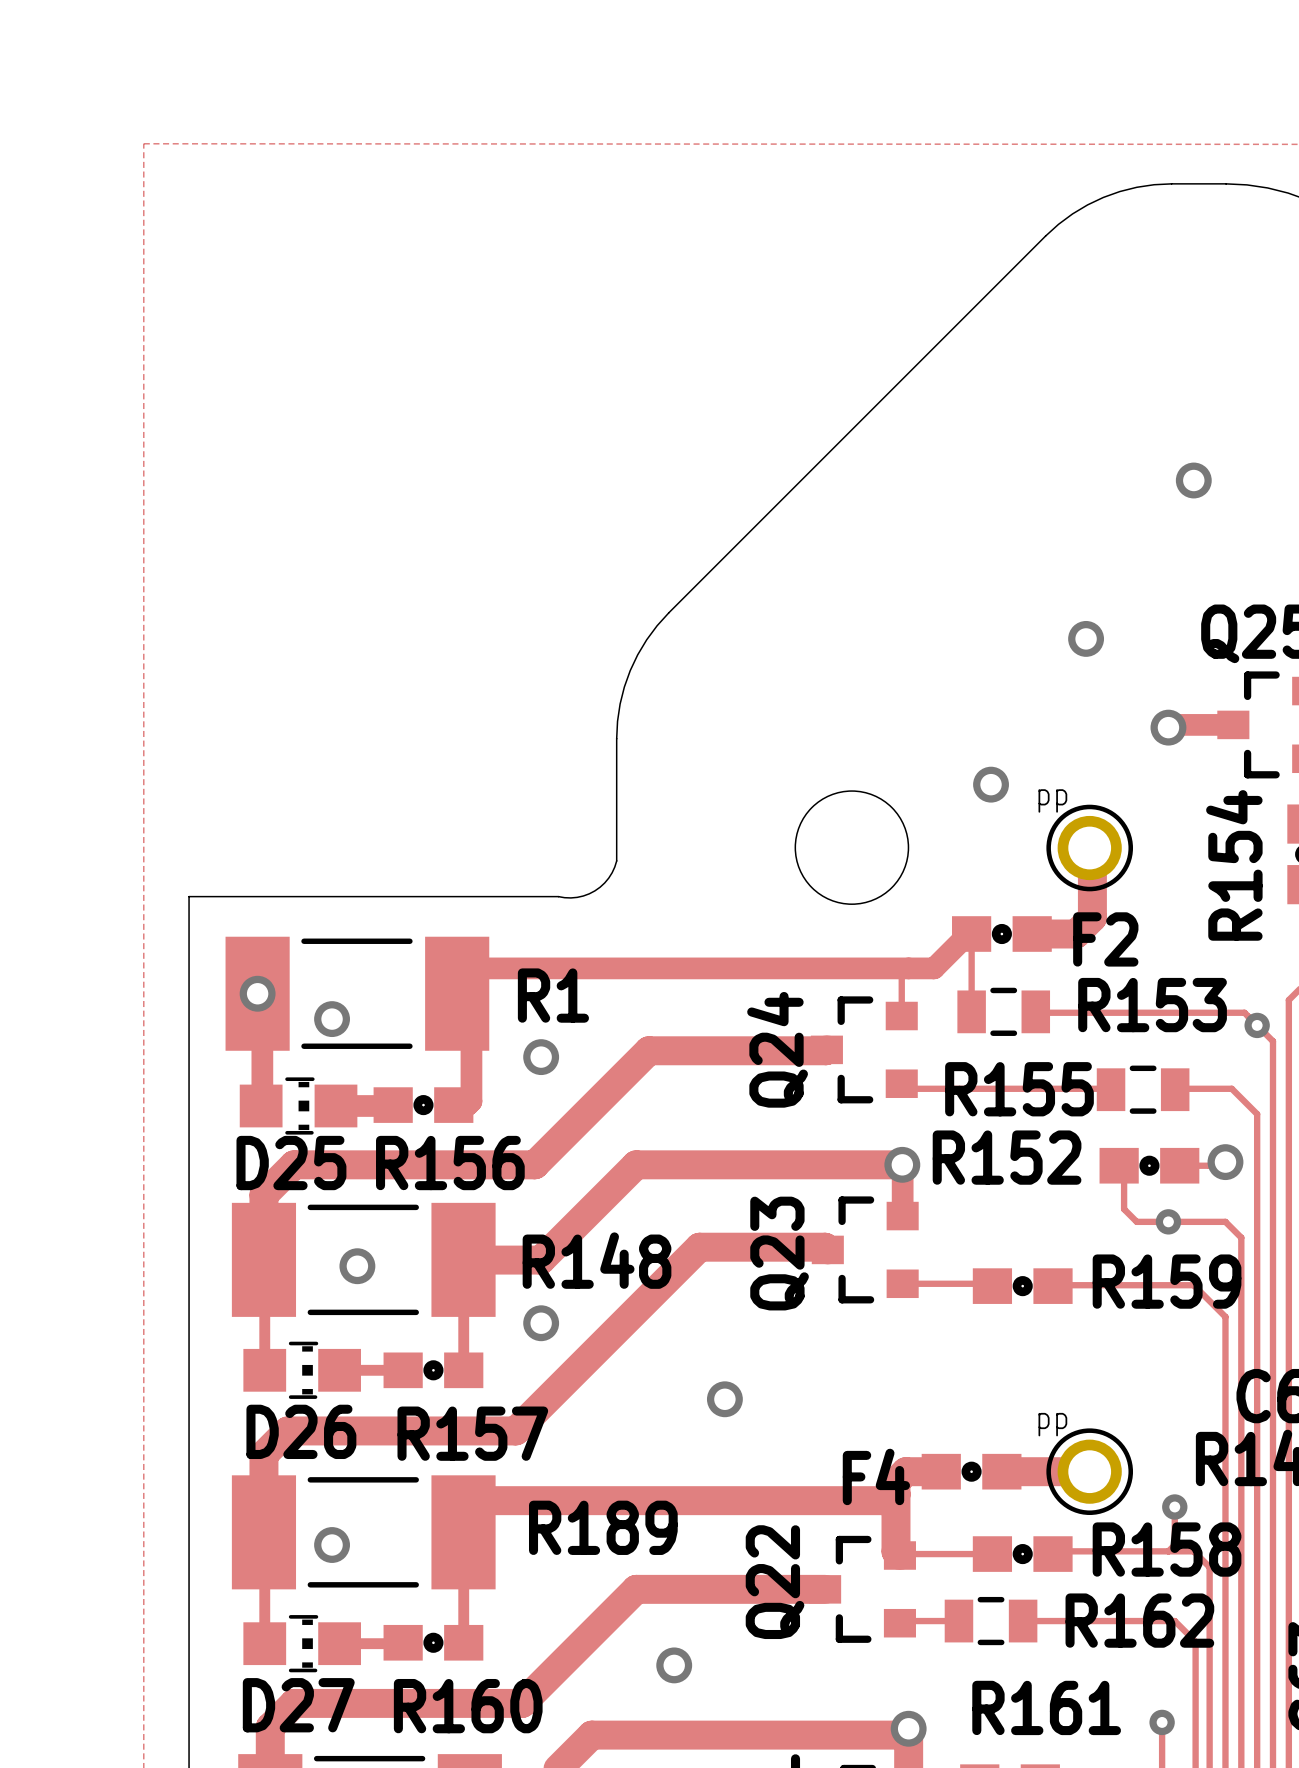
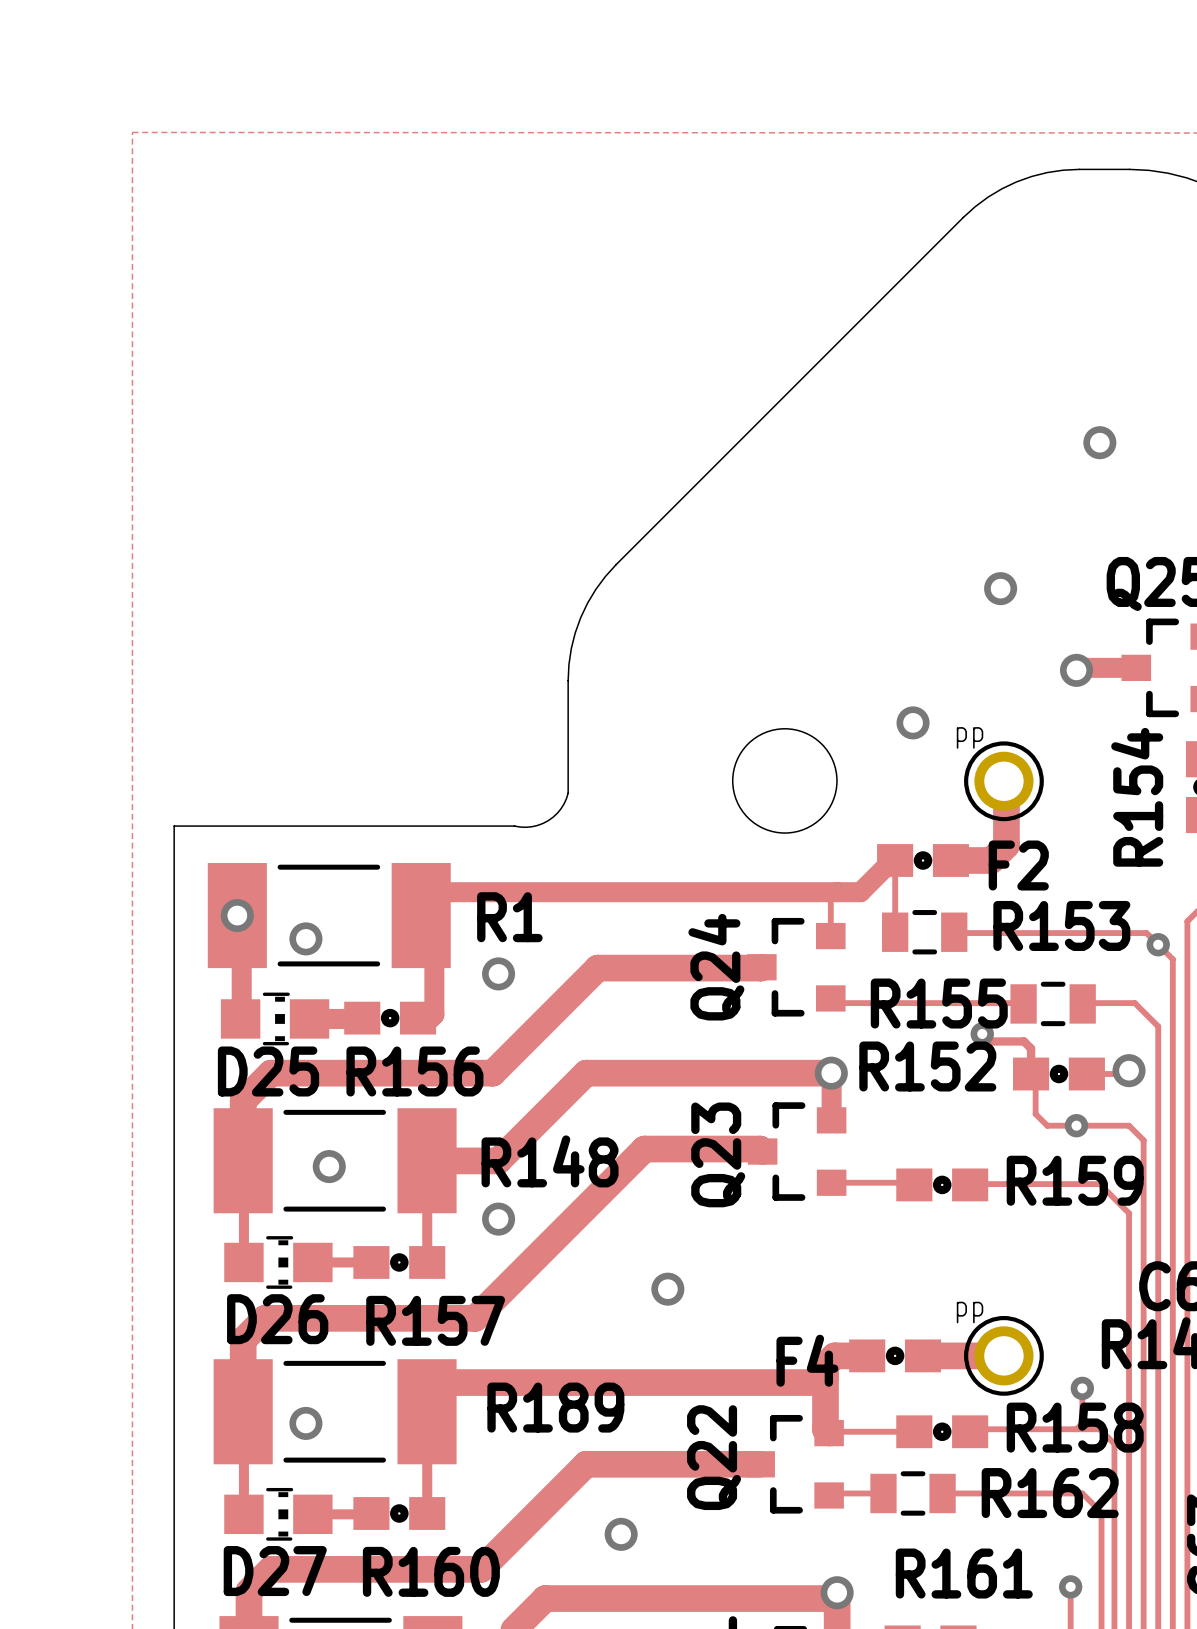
track: none -> (982, 1033) (989, 1041) (1023, 1041) (1031, 1048) (1031, 1074)
via: none -> (982, 1033)

